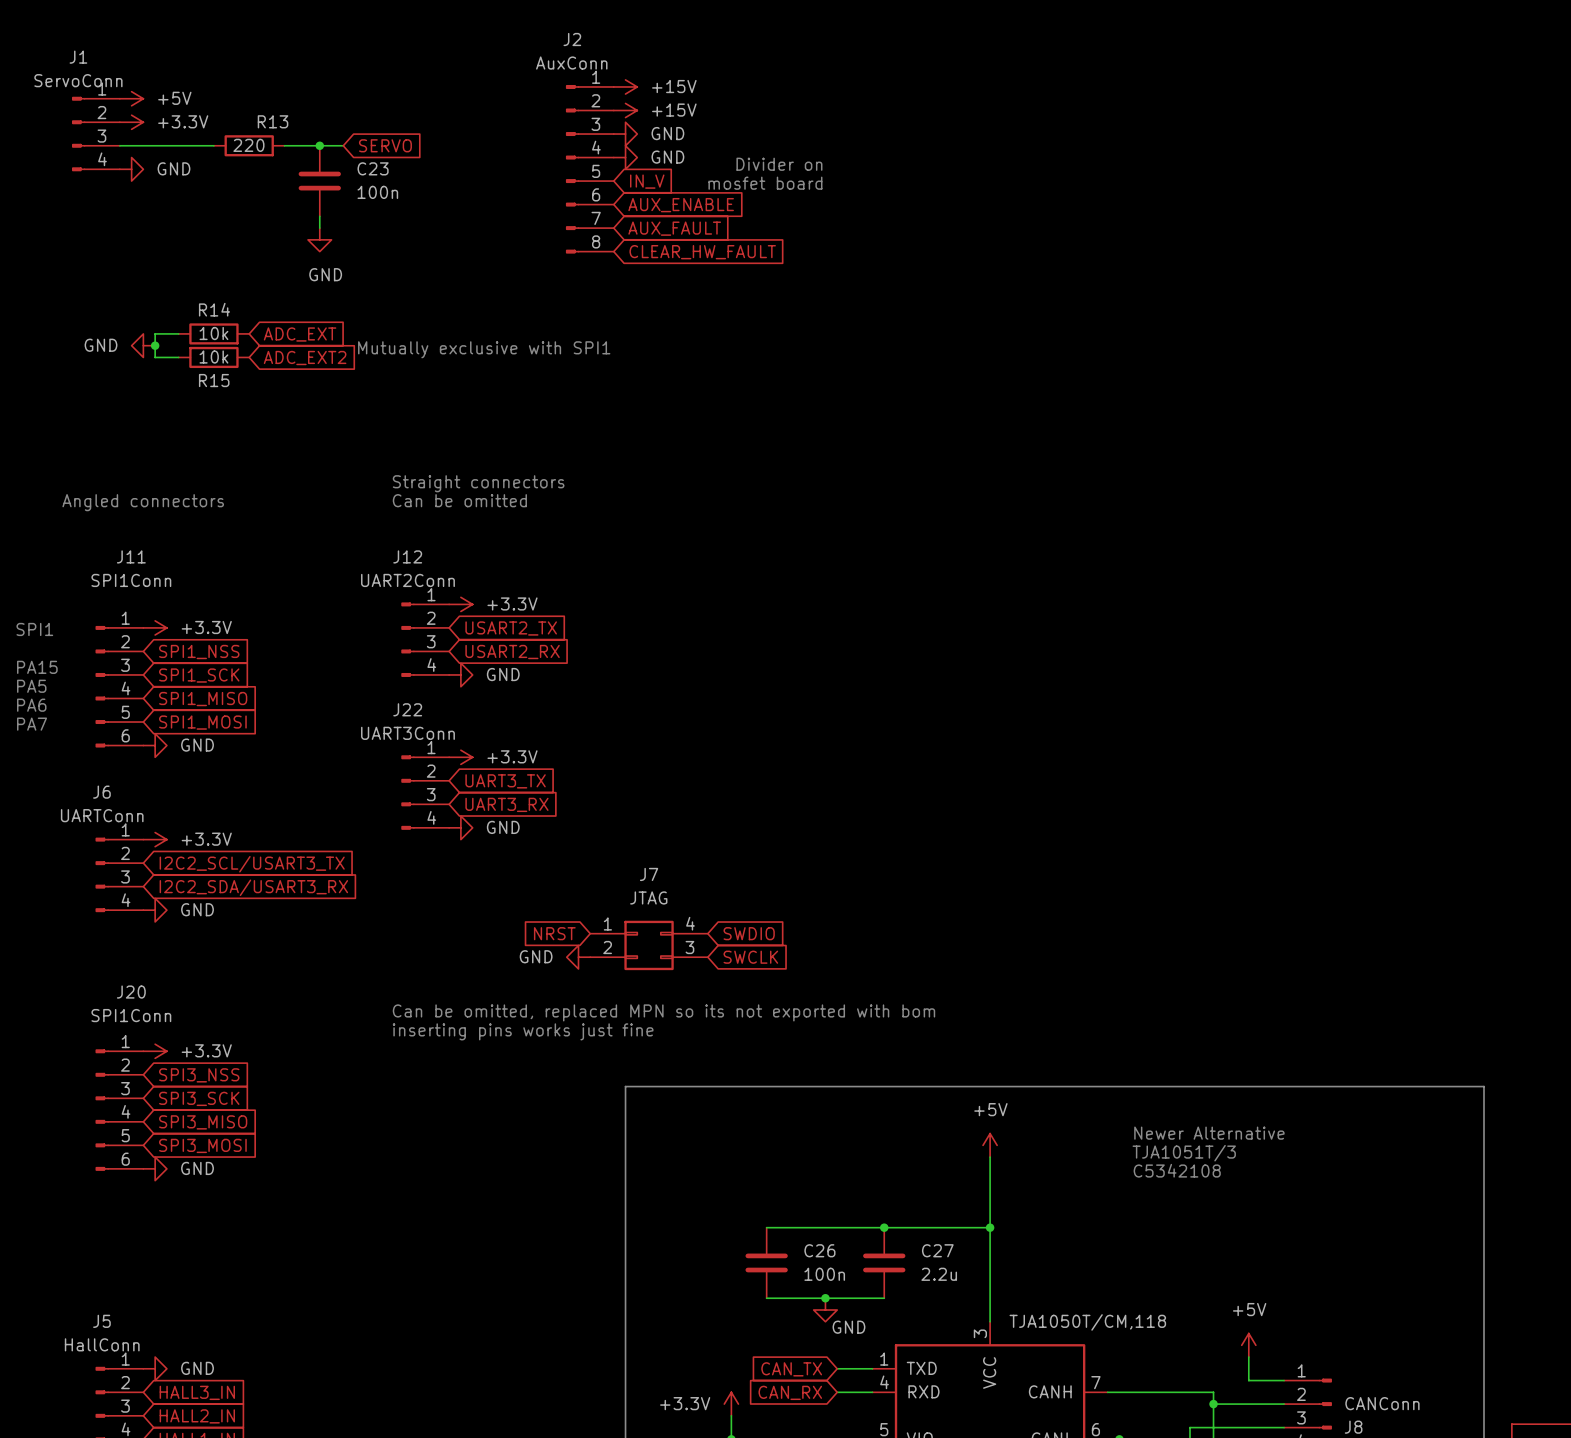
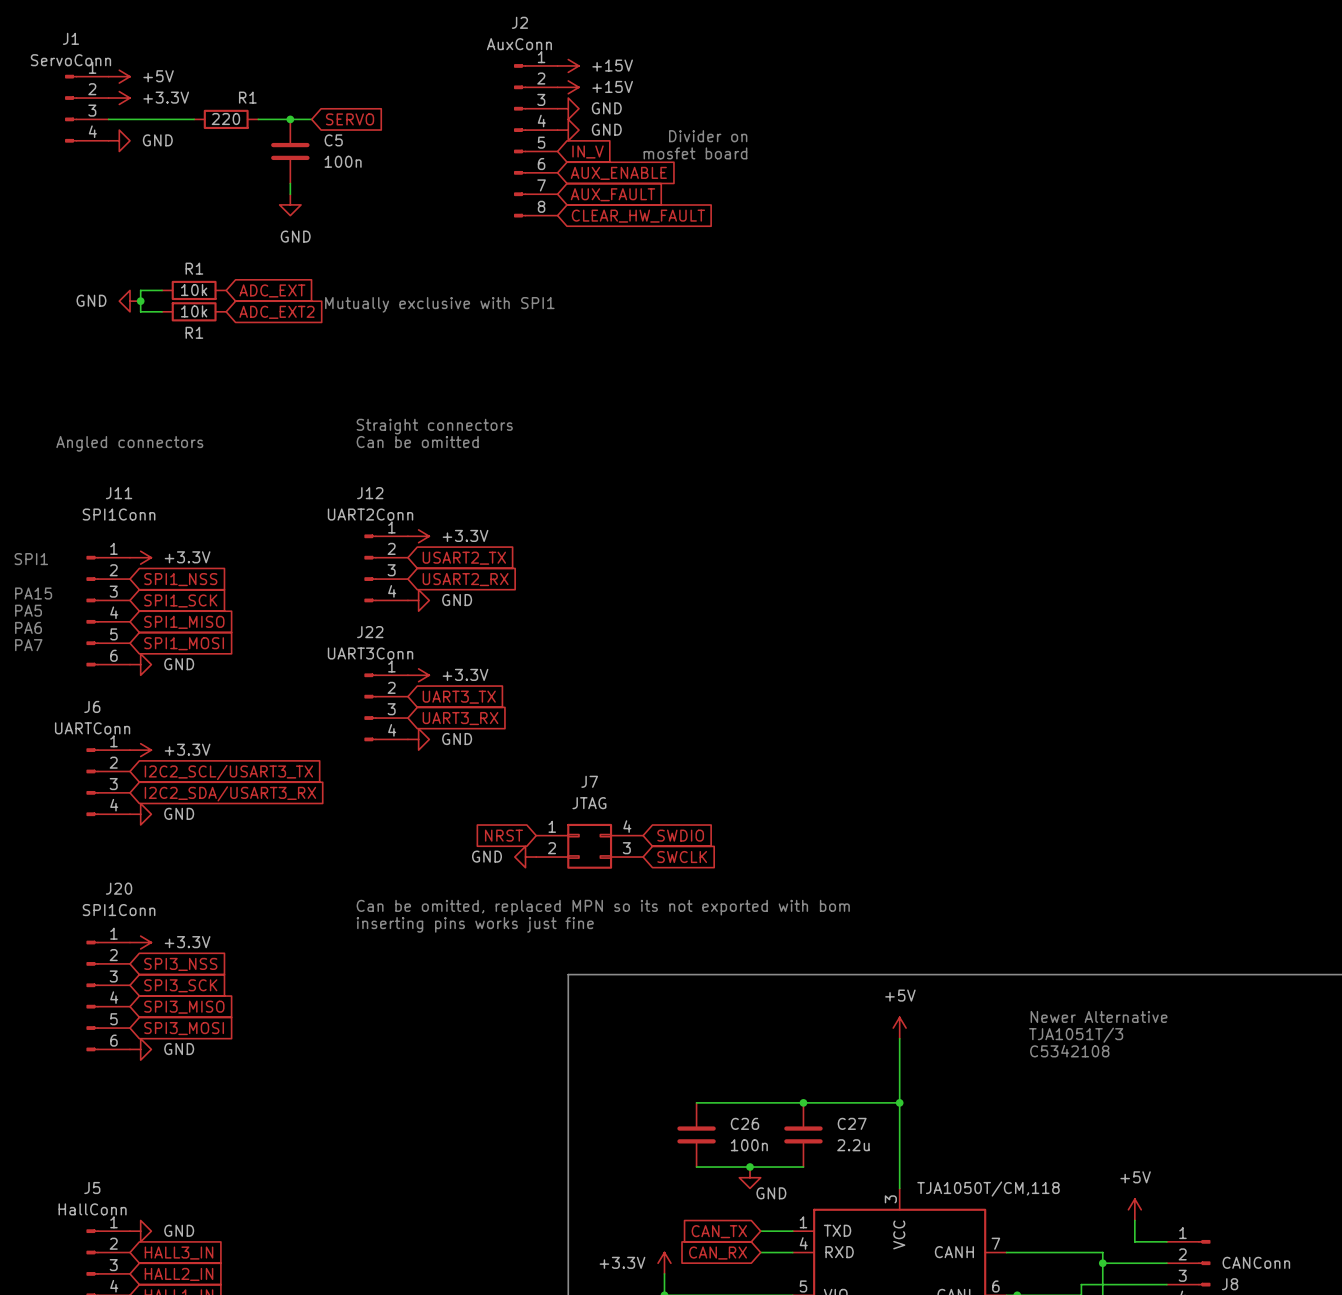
R13 name: R13 (273, 121) -> R1 (247, 97)
C23 name: C23 (373, 168) -> C5 (333, 140)
R14 name: R14 (214, 309) -> R1 (194, 268)
R15 name: R15 (214, 380) -> R1 (194, 332)

